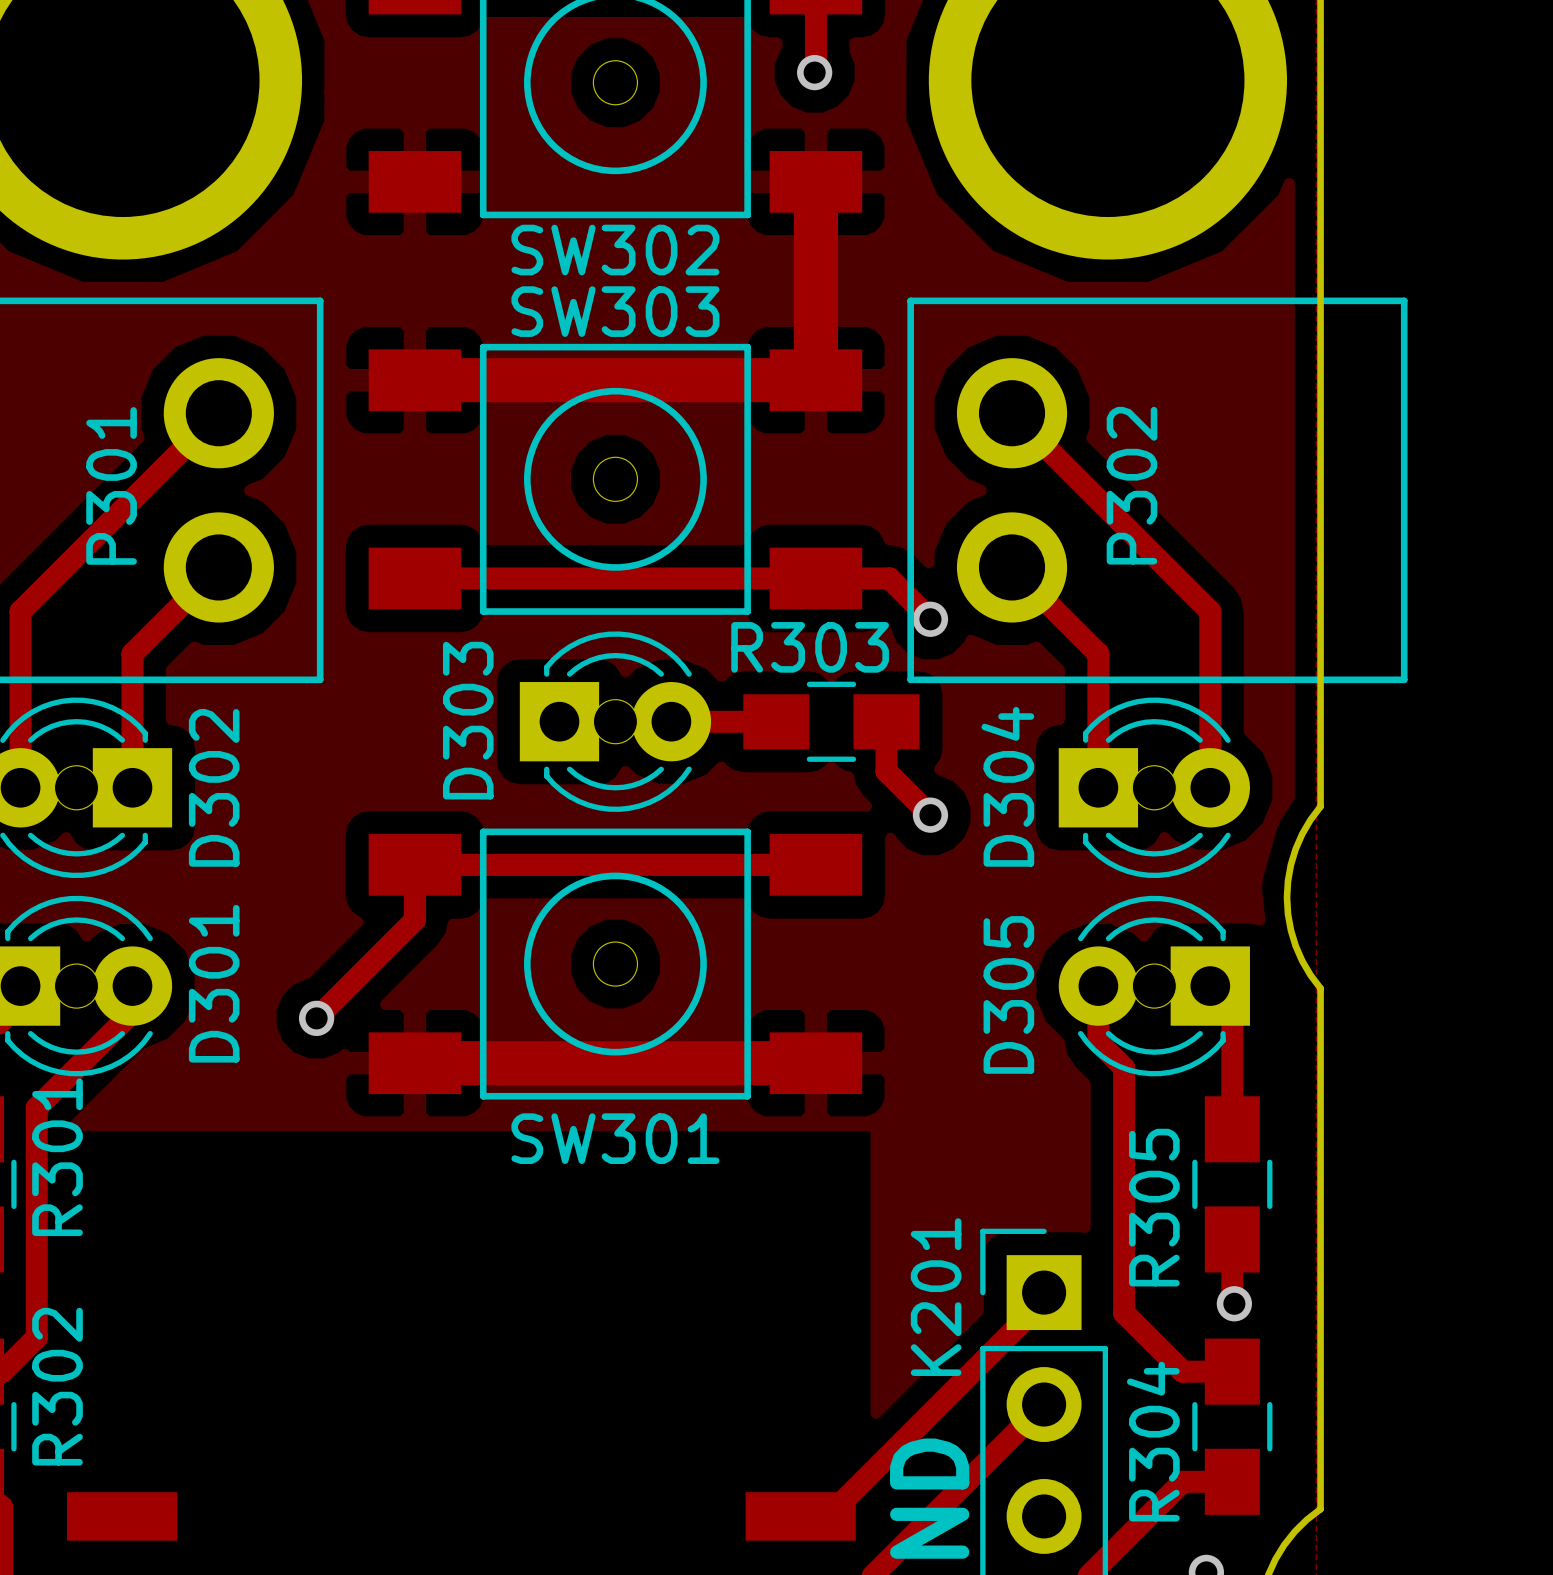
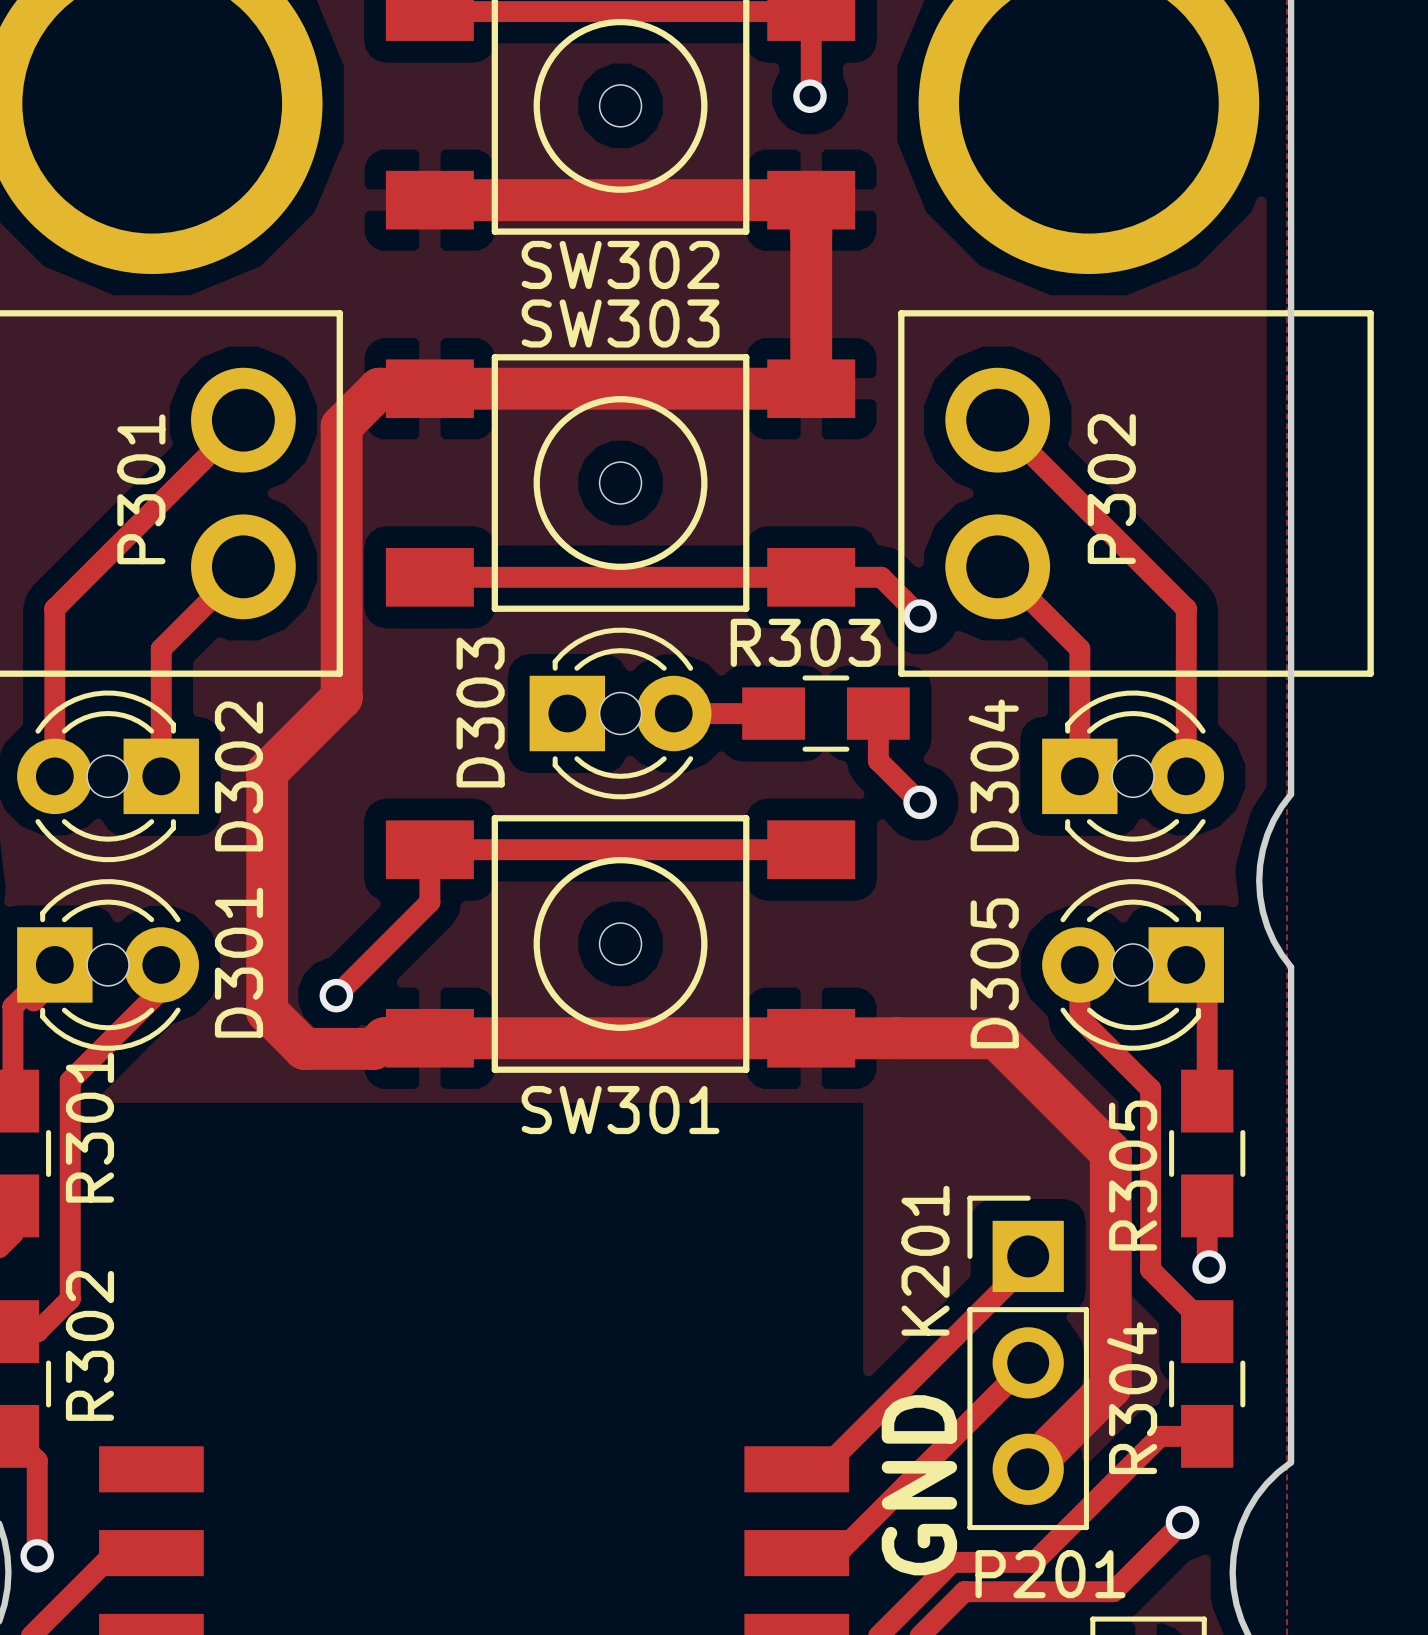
track: none -> (429, 200) (811, 200)
track: none -> (429, 388) (379, 388) (341, 426) (341, 697) (267, 772) (267, 1011) (304, 1048) (373, 1048) (384, 1038) (429, 1038)
track: none -> (811, 1038) (996, 1038) (1110, 1152) (1110, 1386) (1028, 1469)
track: (1124, 1067) (1124, 1313) (1182, 1371) (1232, 1371) -> (1104, 1042) (1150, 1089) (1150, 1269) (1207, 1326) (1207, 1331)

